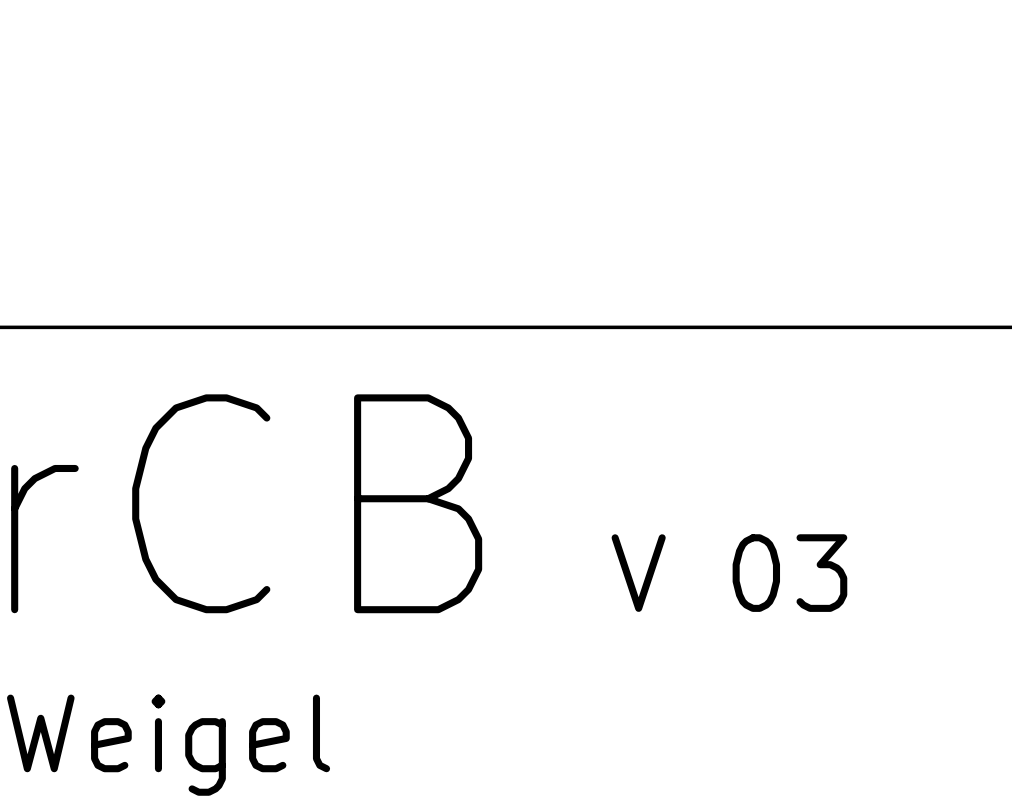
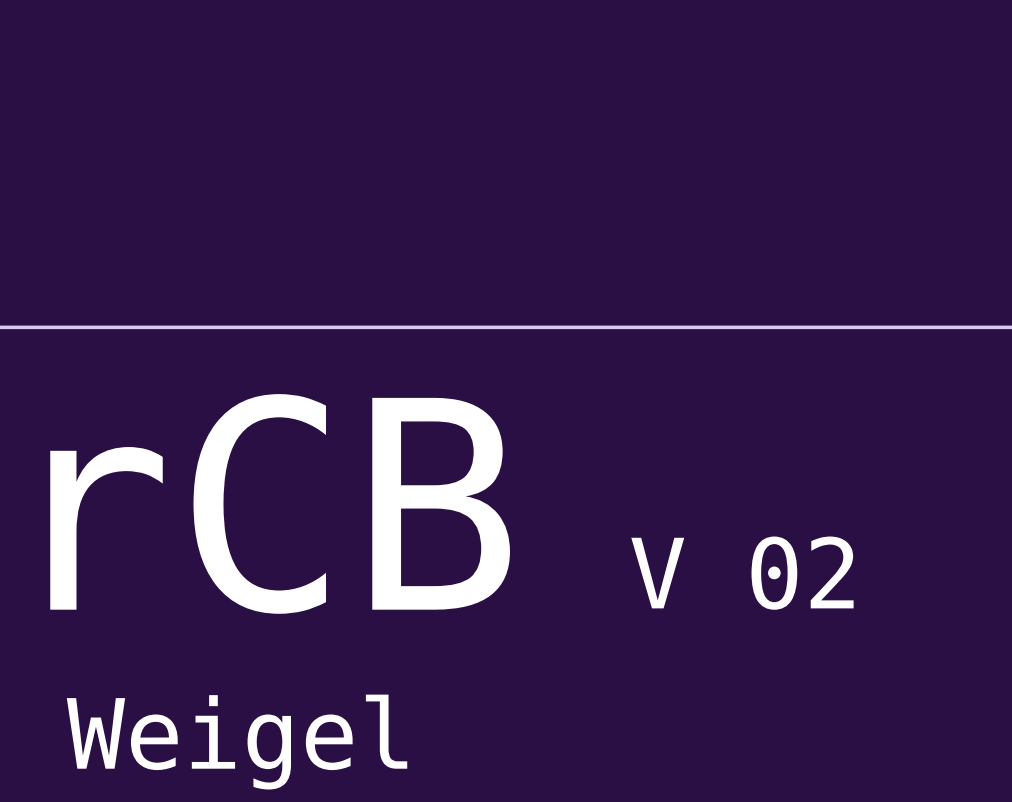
text: V 03 (729, 573) -> V 02 (742, 573)

